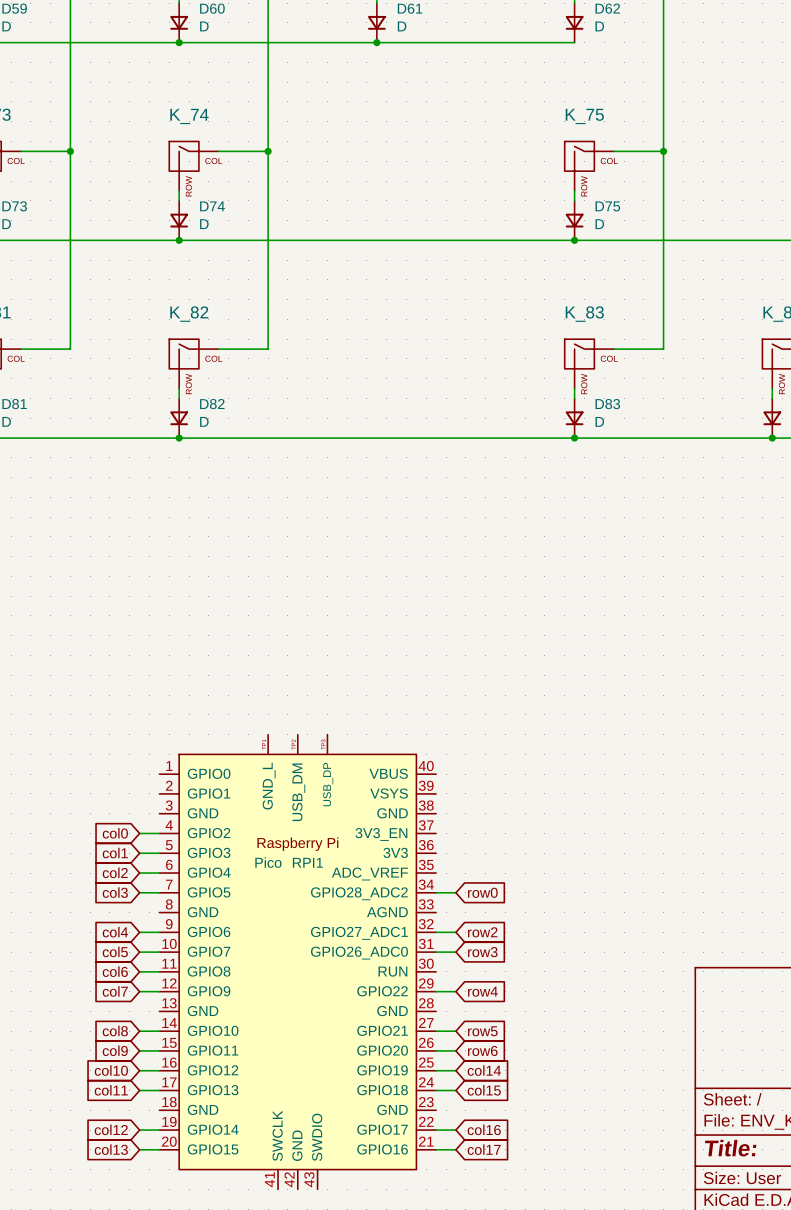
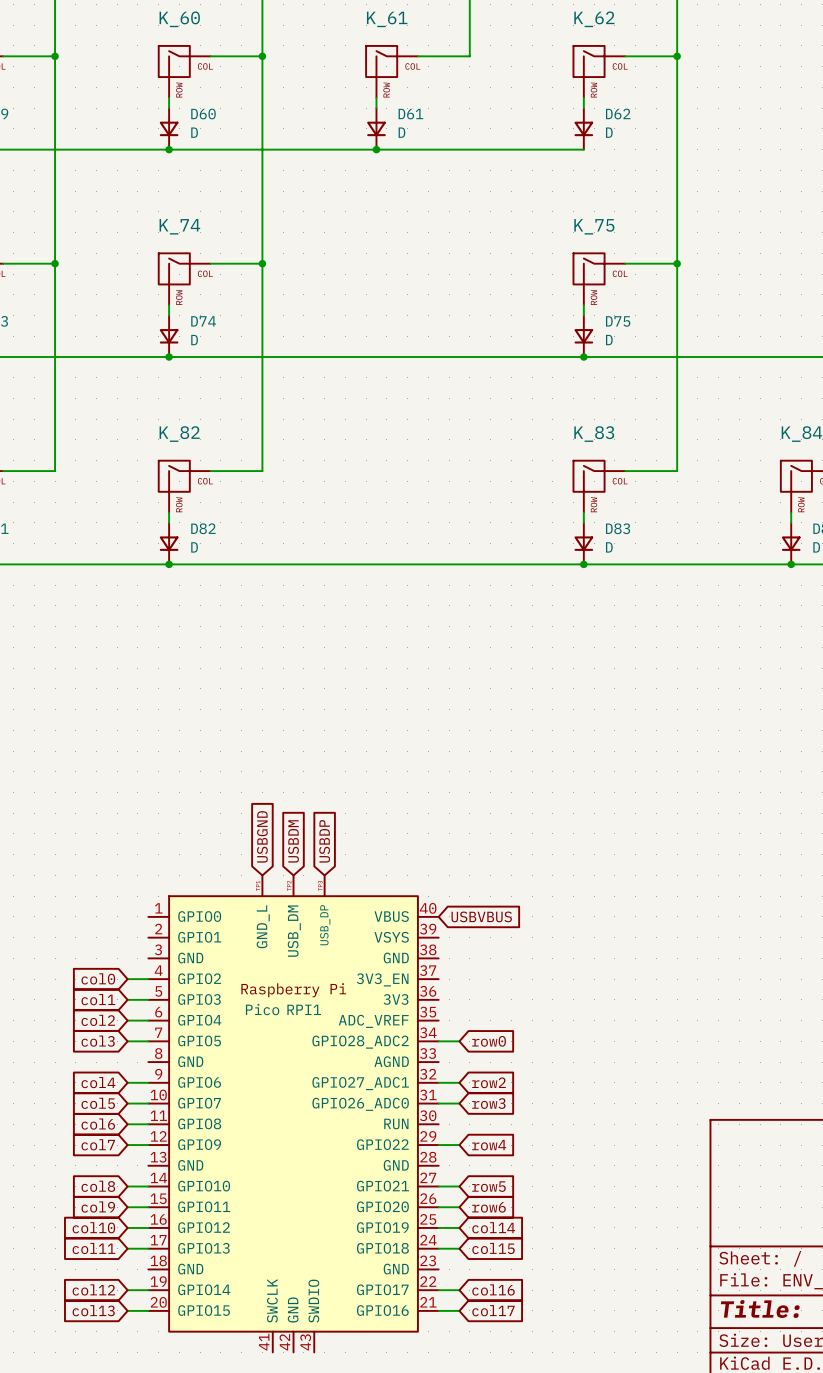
global label: none -> USBGND (262, 836)
global label: none -> USBDM (293, 841)
global label: none -> USBDP (324, 841)
global label: none -> USBVBUS (481, 916)

